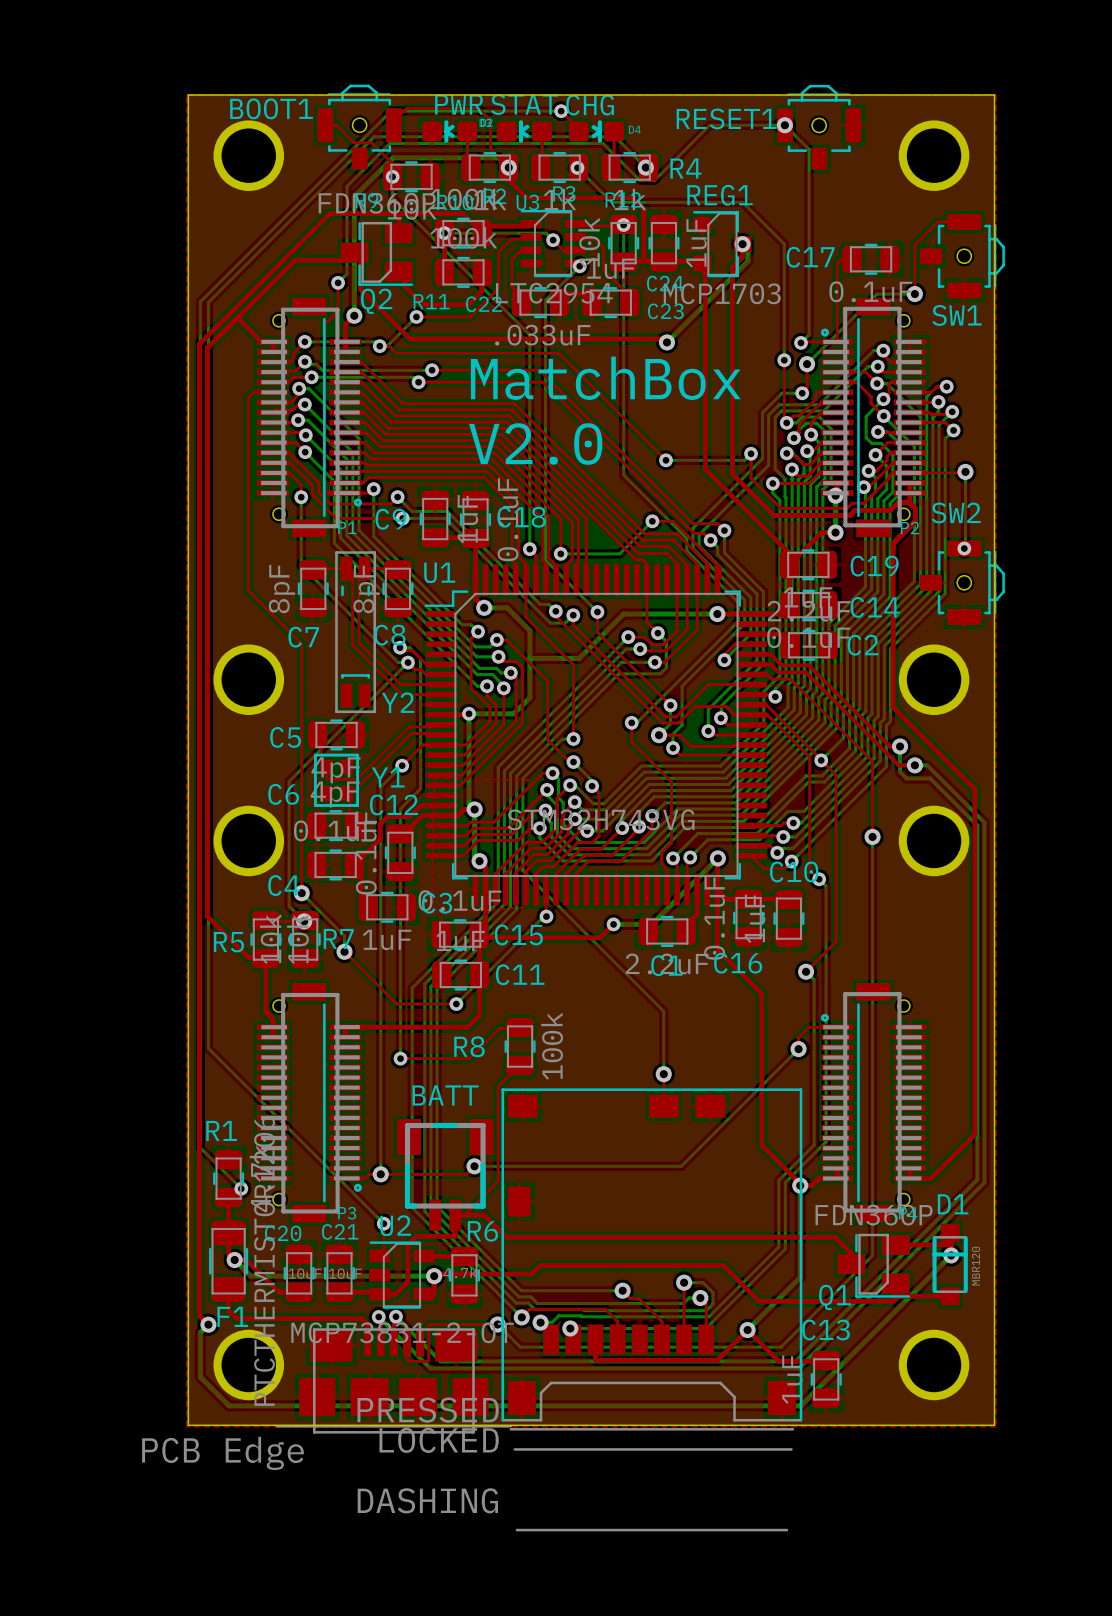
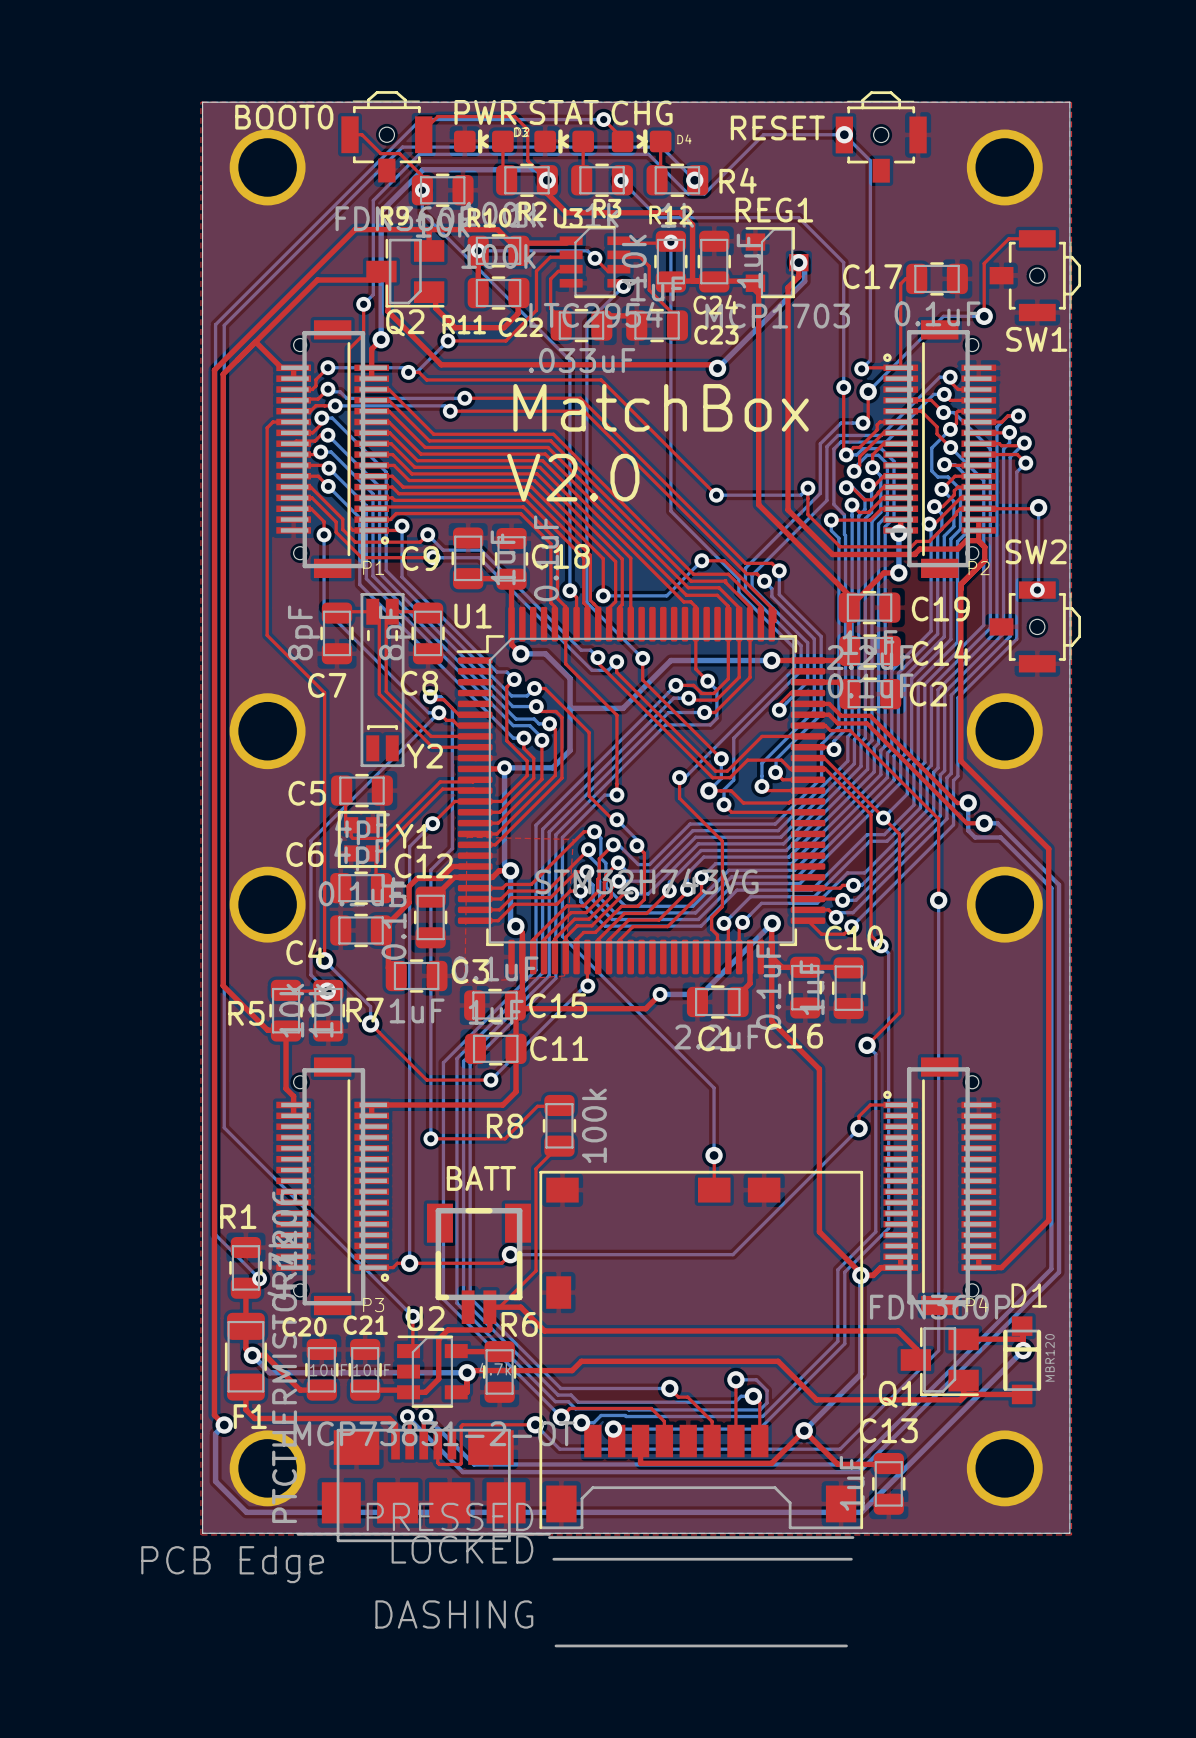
BOOT1 name: BOOT1 (271, 108) -> BOOT0 (284, 117)
RESET1 name: RESET1 (726, 118) -> RESET (777, 127)

